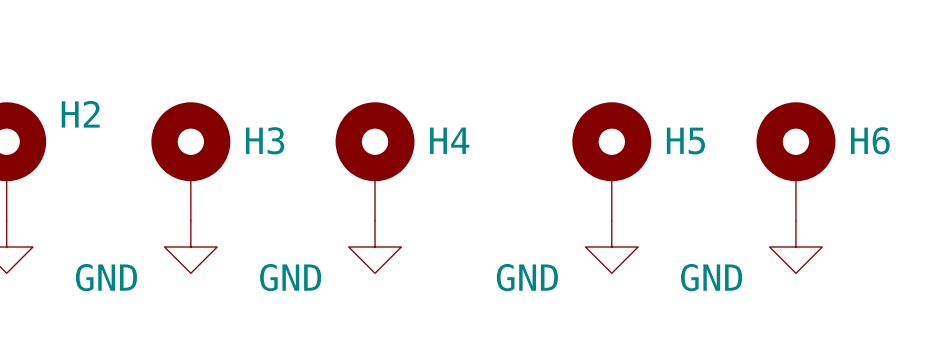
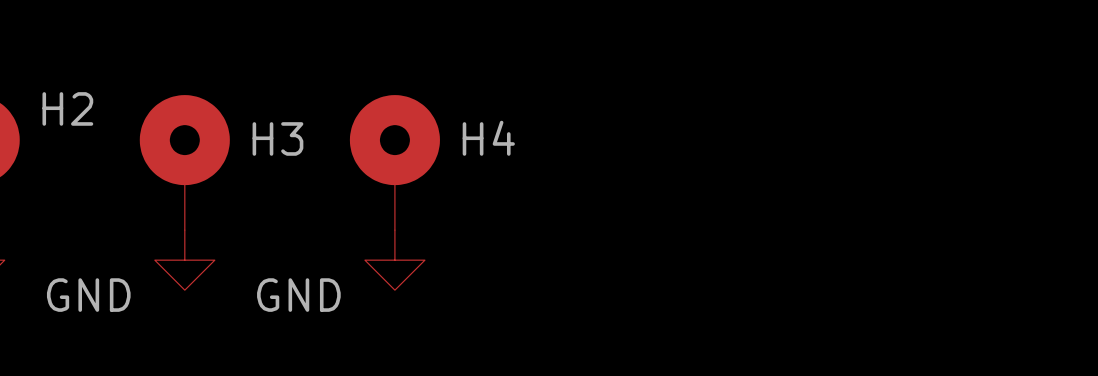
H5: (611, 161) -> none
H6: (795, 161) -> none
power symbol: GND (611, 246) -> none
power symbol: GND (795, 246) -> none

